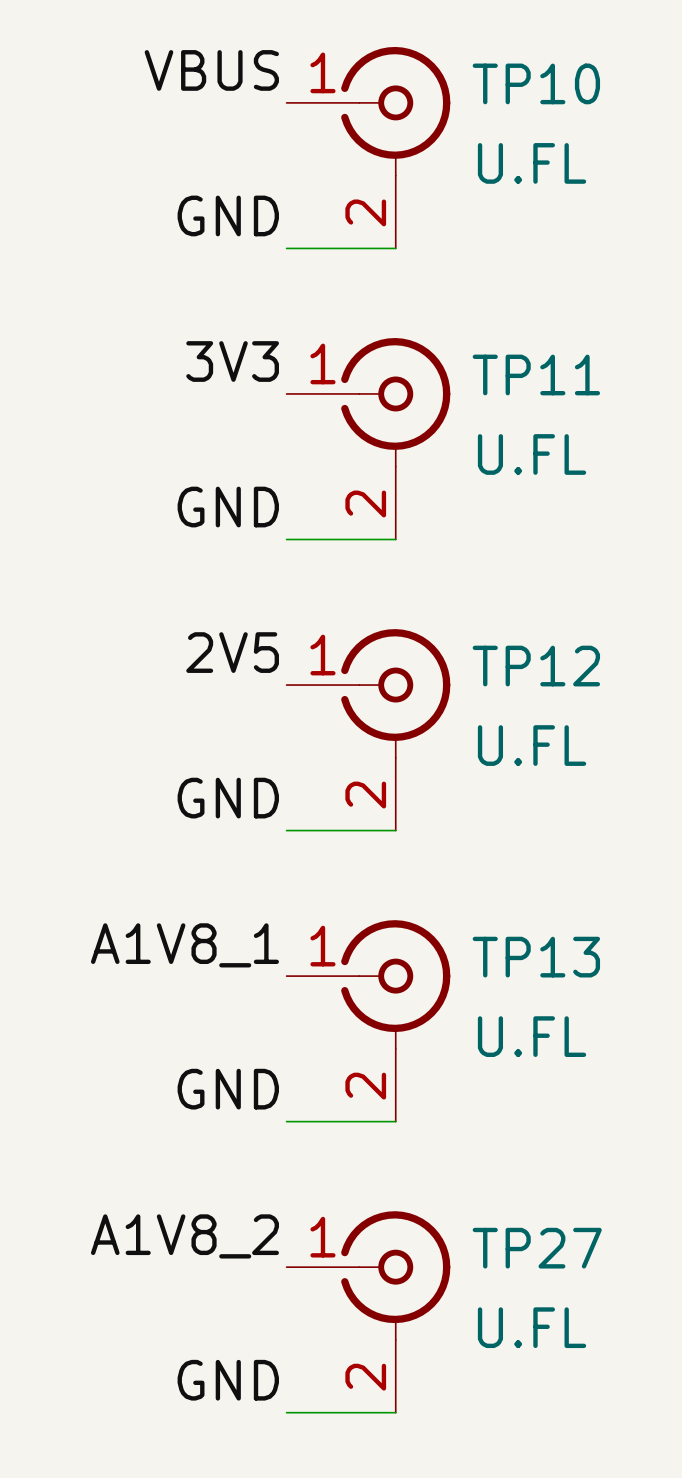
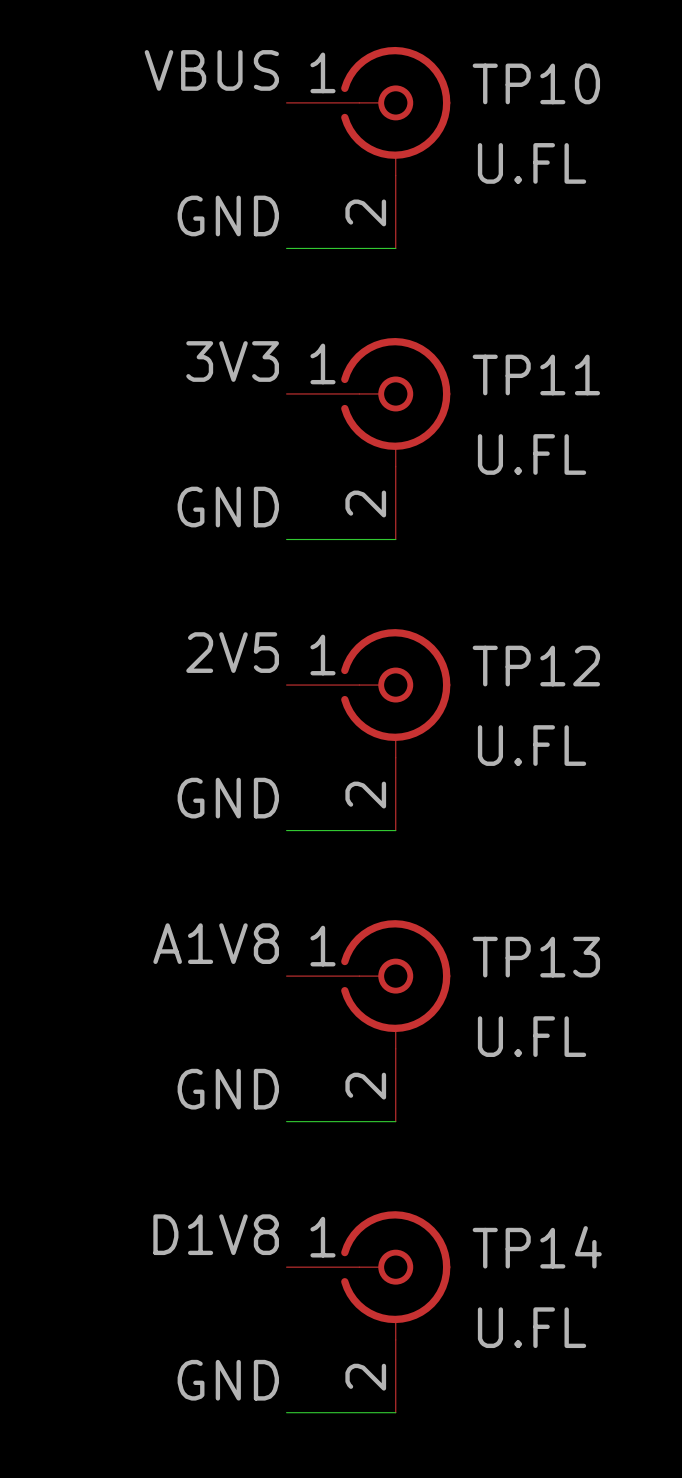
label: A1V8_1 (184, 945) -> A1V8 (216, 943)
label: A1V8_2 (184, 1236) -> D1V8 (216, 1234)
TP27 name: TP27 (537, 1248) -> TP14 (537, 1247)

